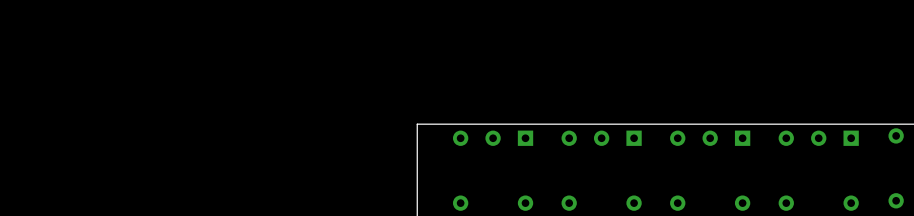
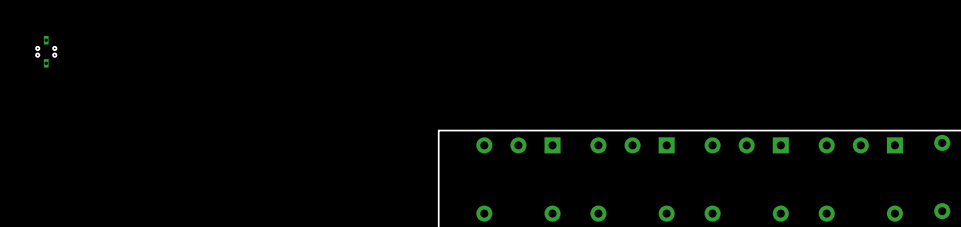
part: none -> (46, 51)

